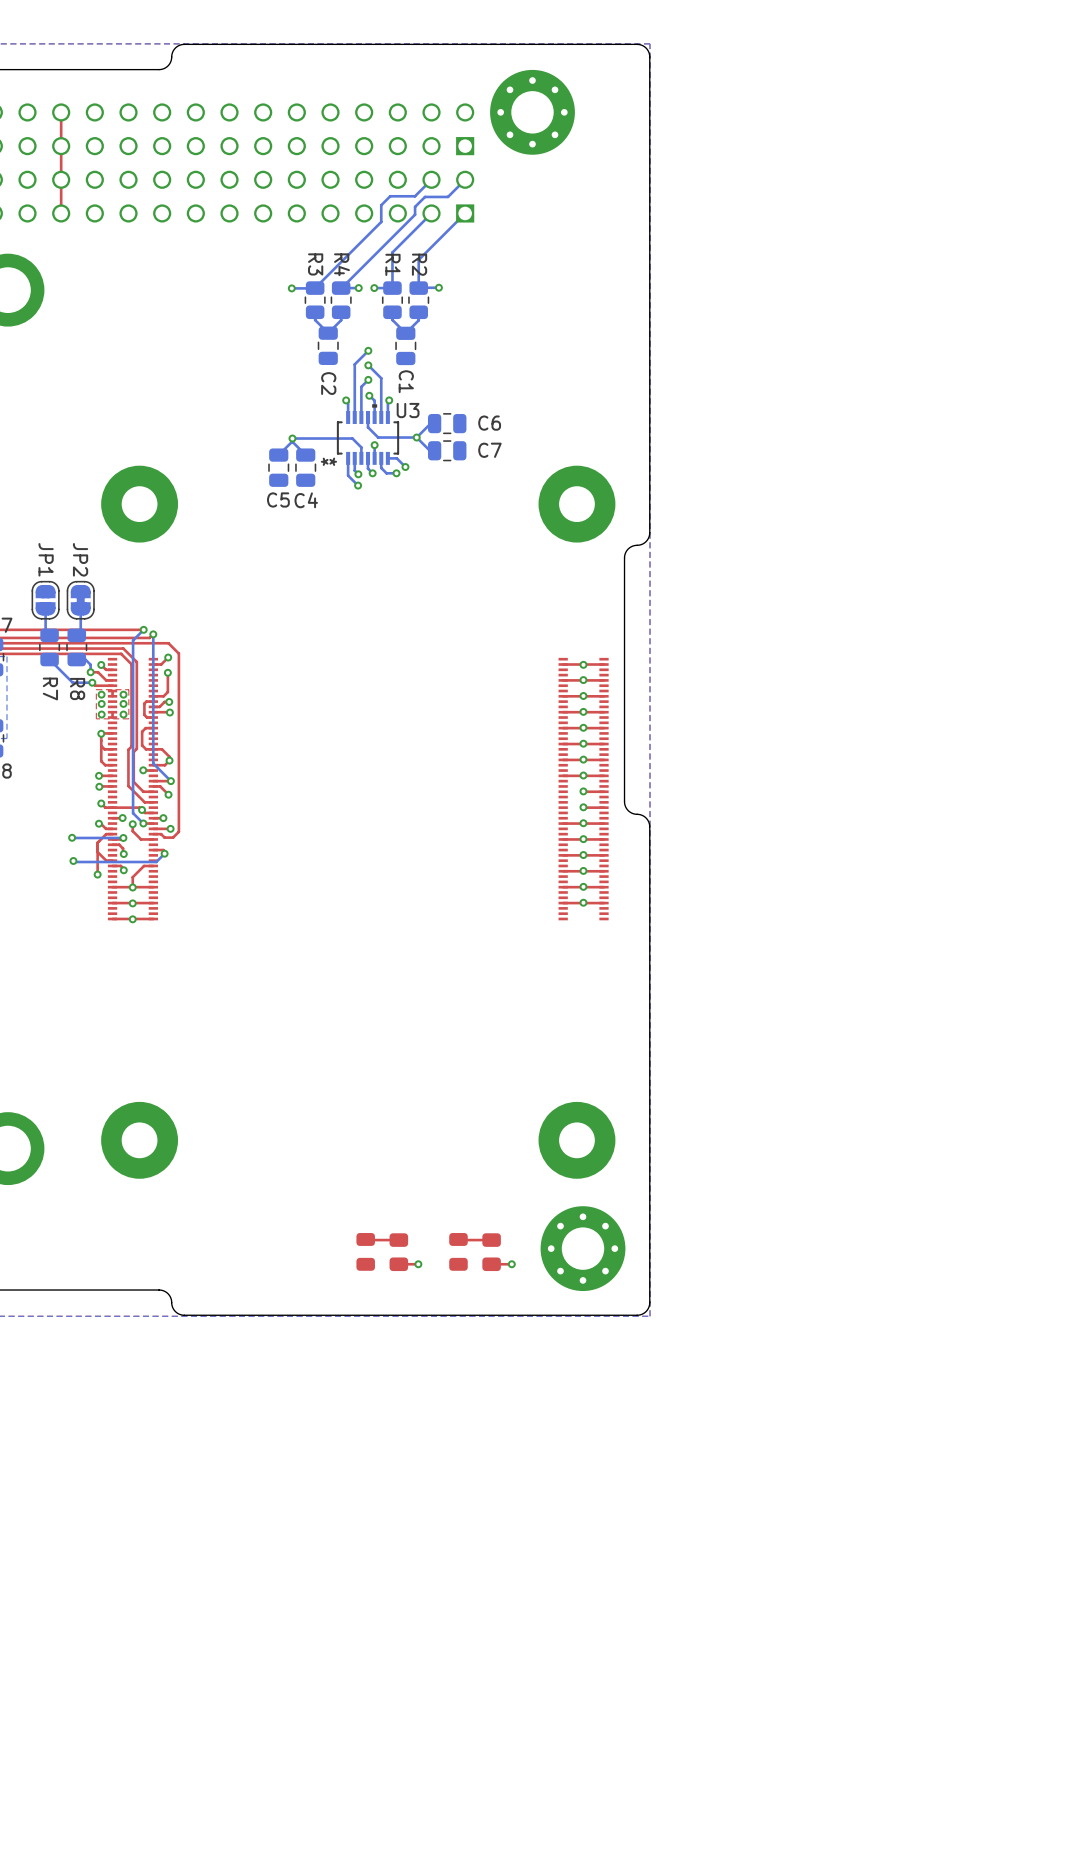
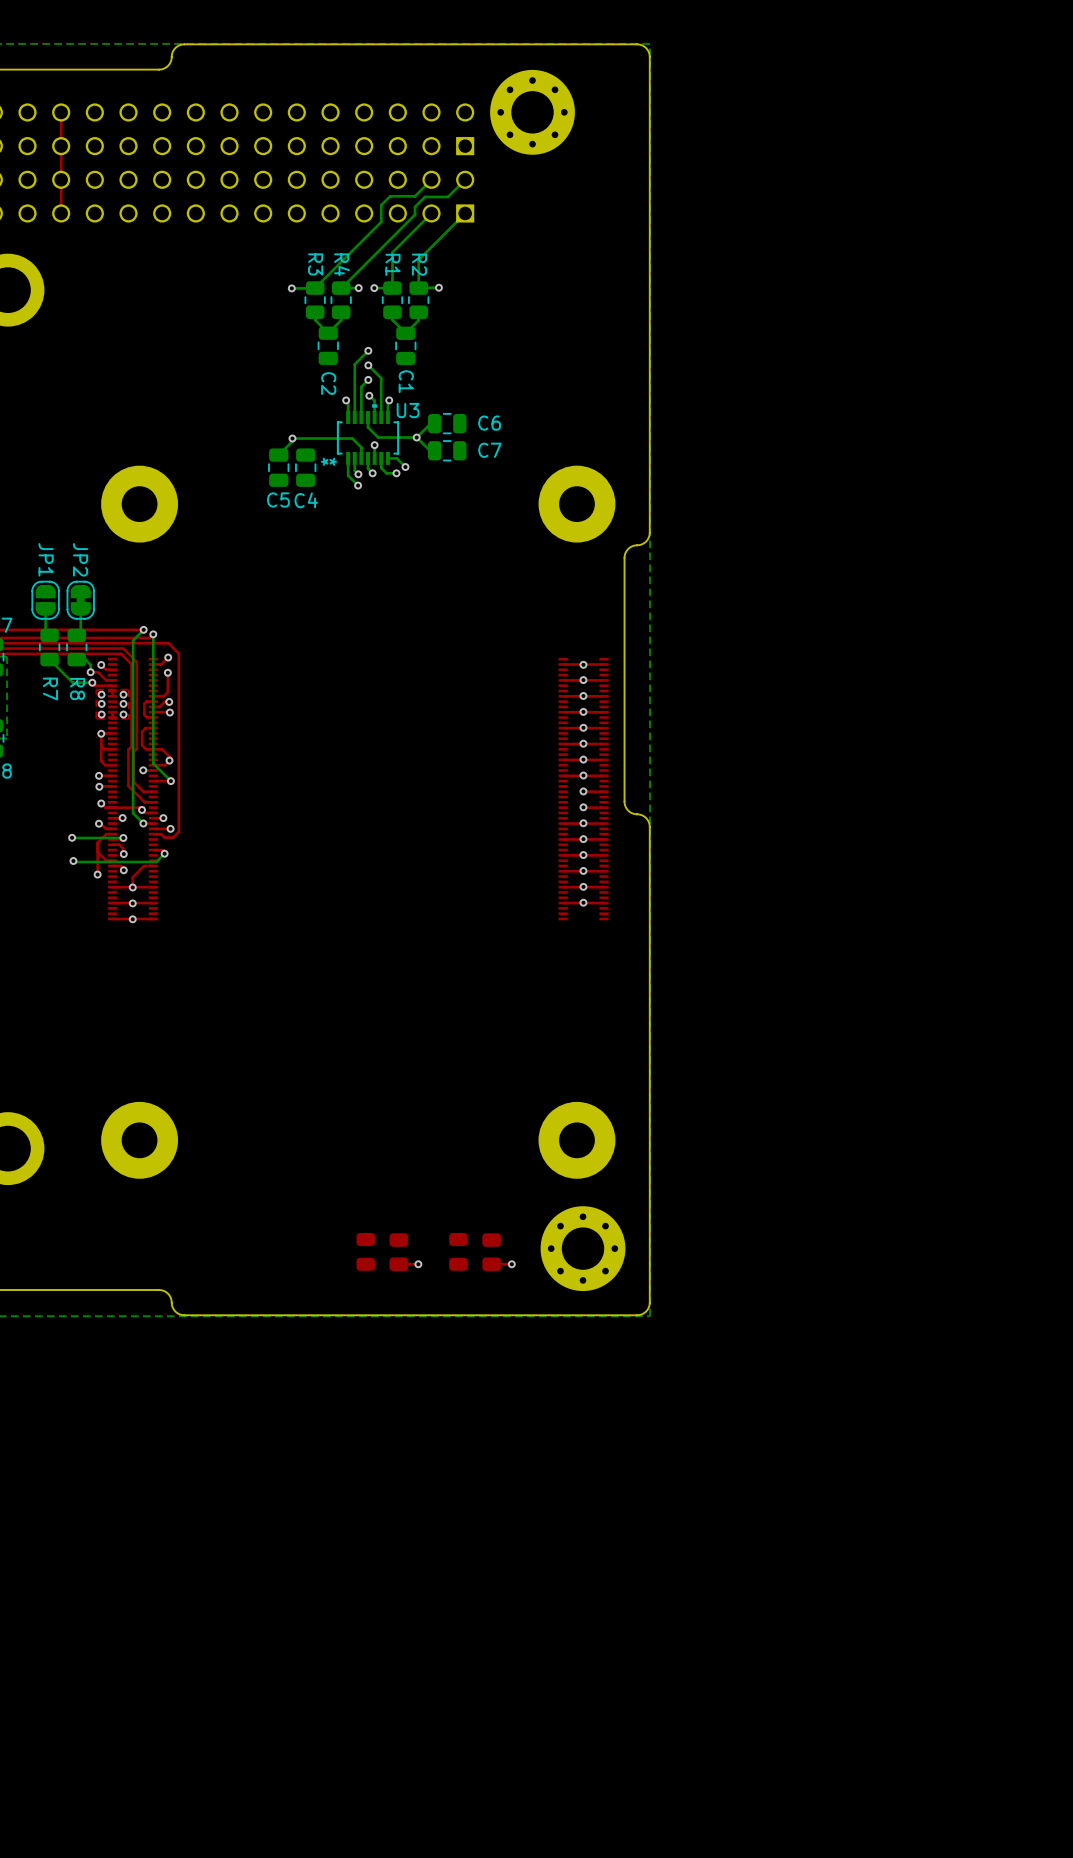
bottom track: (292, 441) (305, 455) -> none
top track: (153, 786) (160, 786) (168, 794) -> none
via: (168, 794) -> none
top track: (132, 824) (132, 831) (141, 839) (153, 839) -> none
via: (132, 824) -> none
top track: (365, 1239) (398, 1240) -> none
top track: (458, 1239) (491, 1240) -> none

